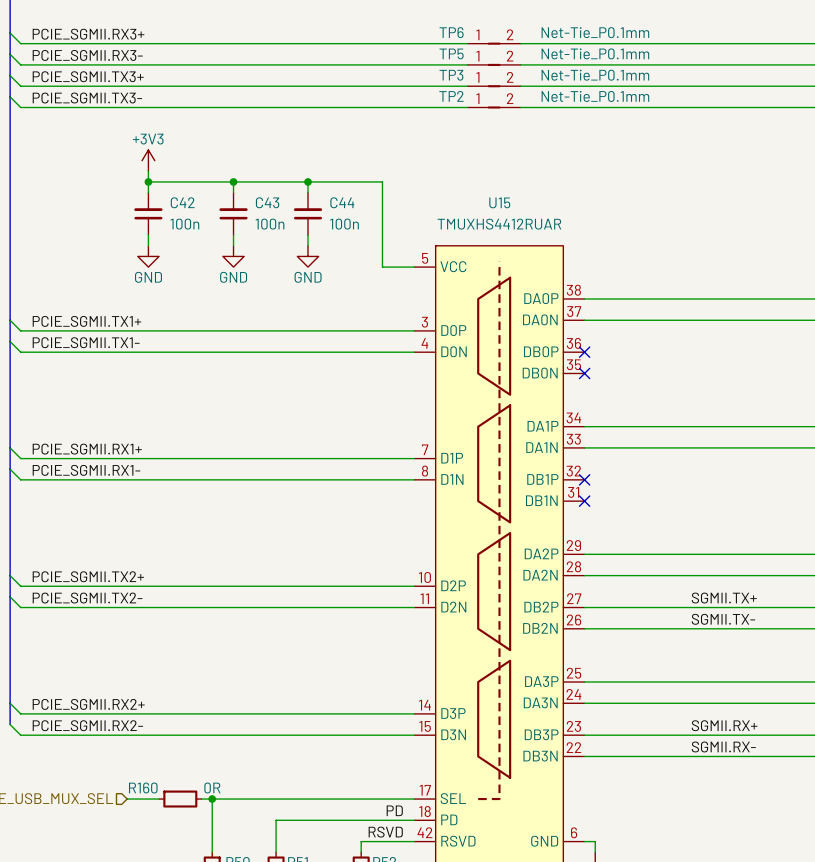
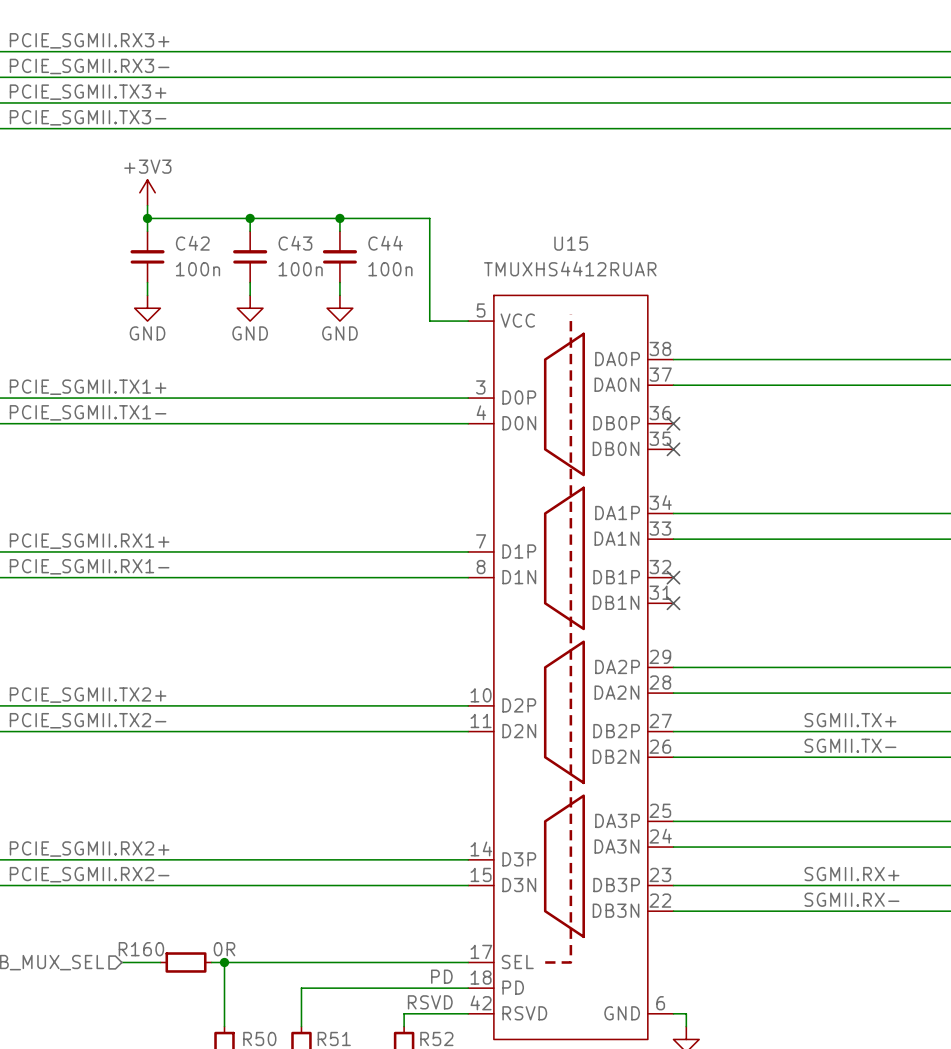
TP6: Net-Tie_P0.1mm (494, 43) -> none
TP5: Net-Tie_P0.1mm (494, 64) -> none
TP3: Net-Tie_P0.1mm (494, 86) -> none
TP2: Net-Tie_P0.1mm (494, 107) -> none

